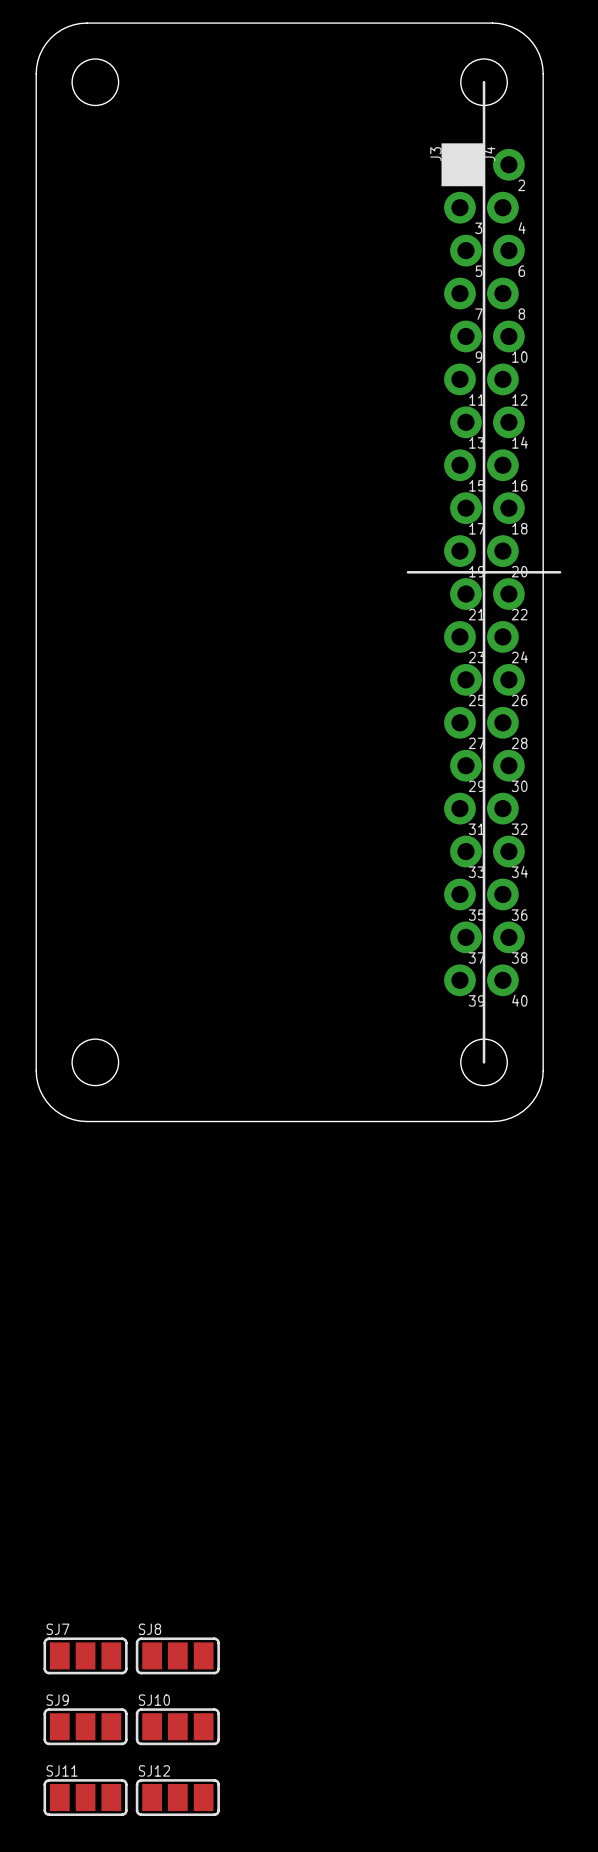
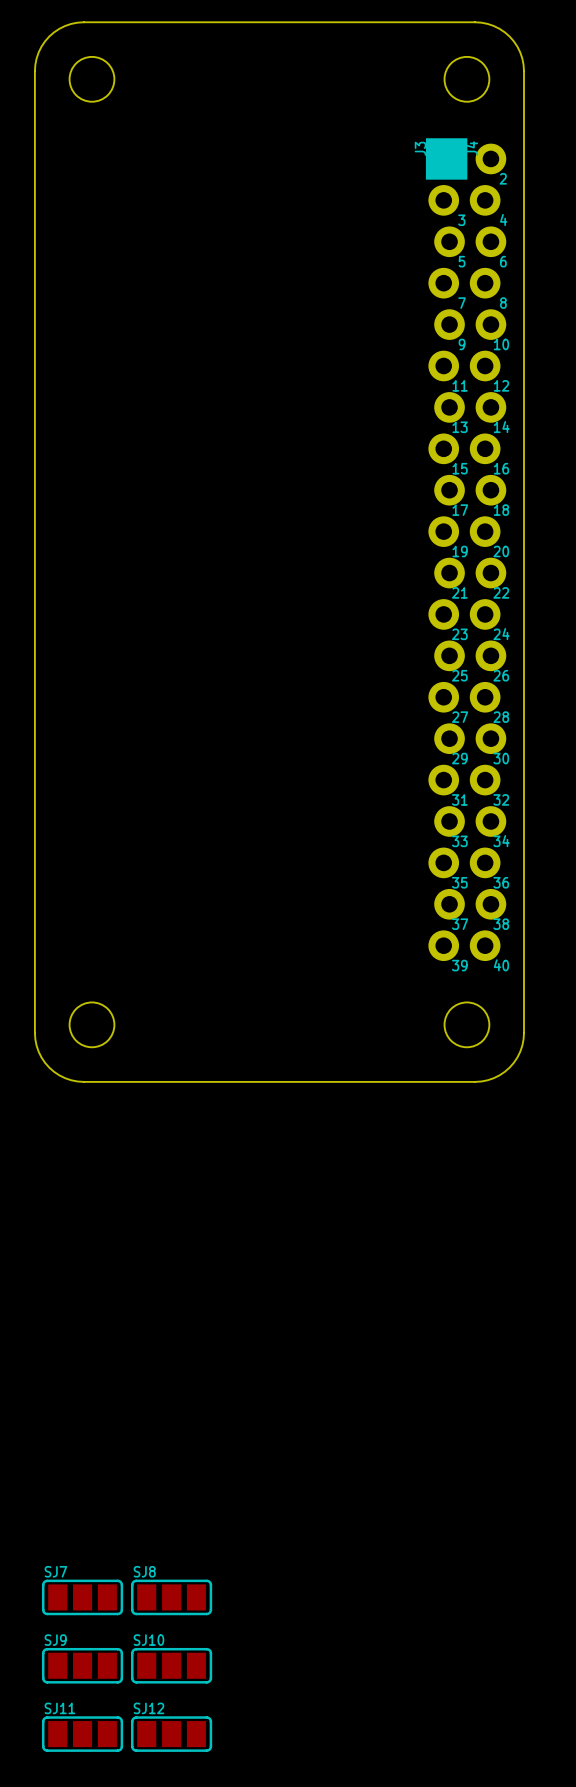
line: (484, 82) (484, 1062) -> none
line: (407, 572) (560, 572) -> none

